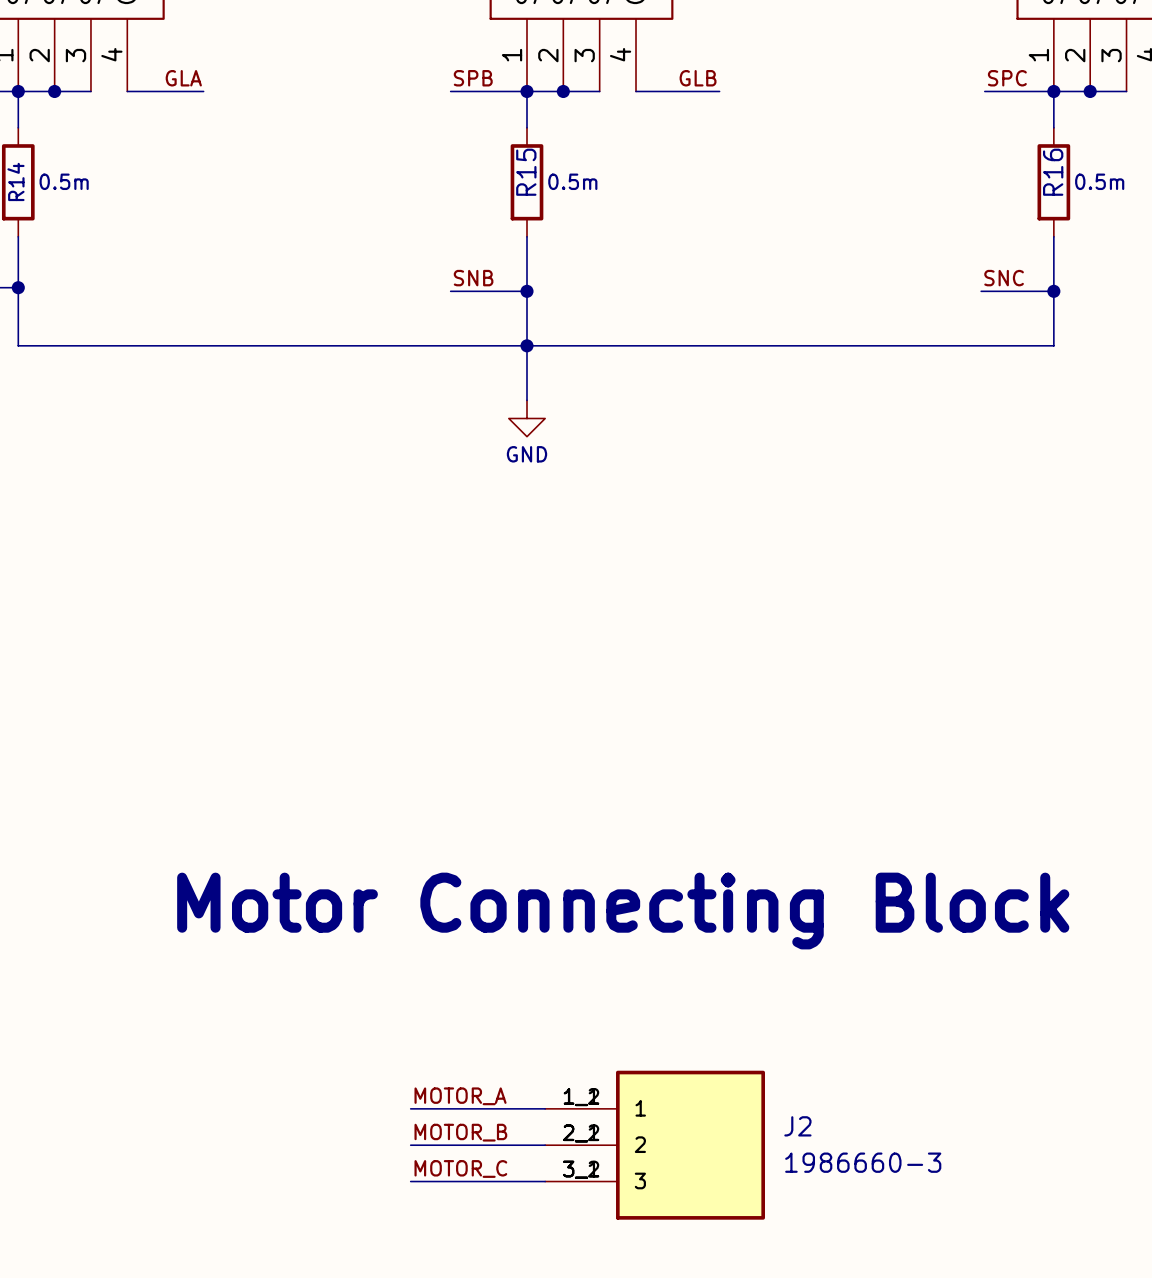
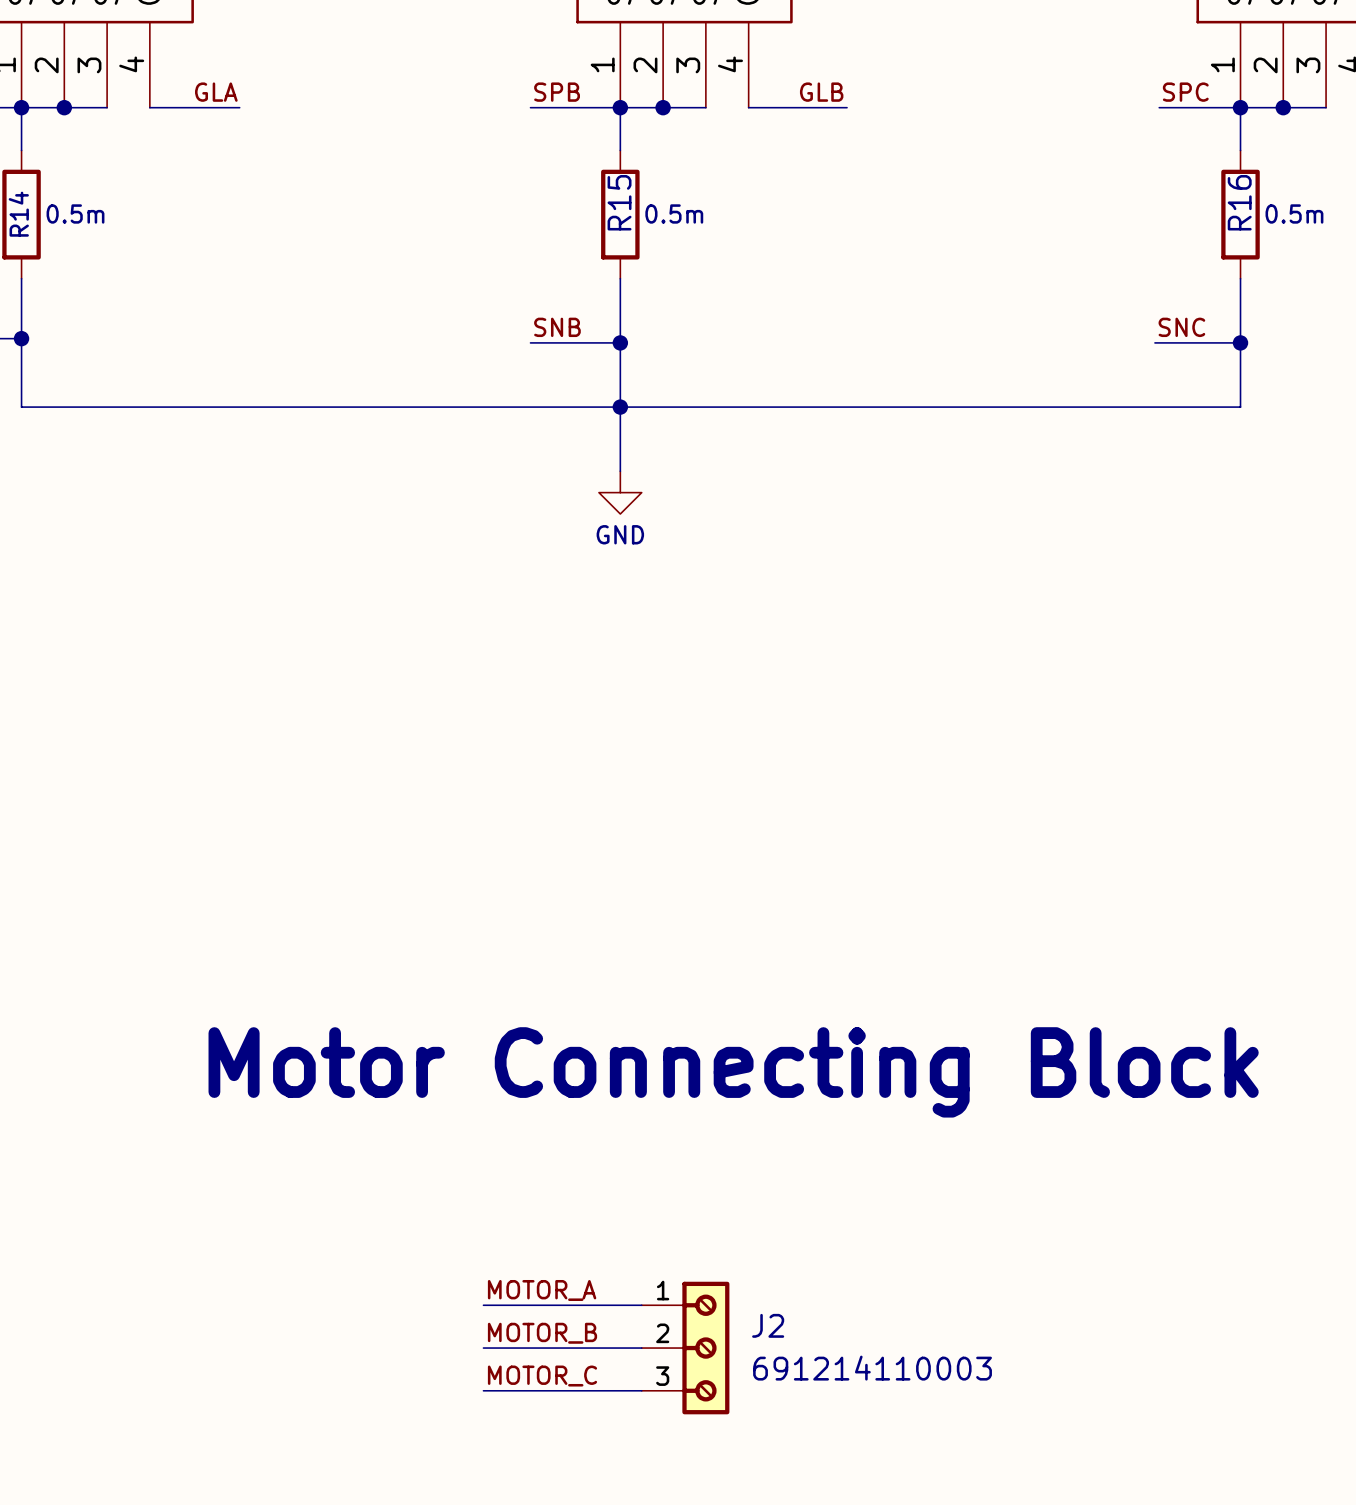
J2 symbol: [545, 1070, 765, 1220] -> [641, 1281, 730, 1415]
J2 name position: J2 (797, 1126) -> J2 (768, 1325)
J2 value: 1986660-3 (863, 1162) -> 691214110003 (872, 1368)

